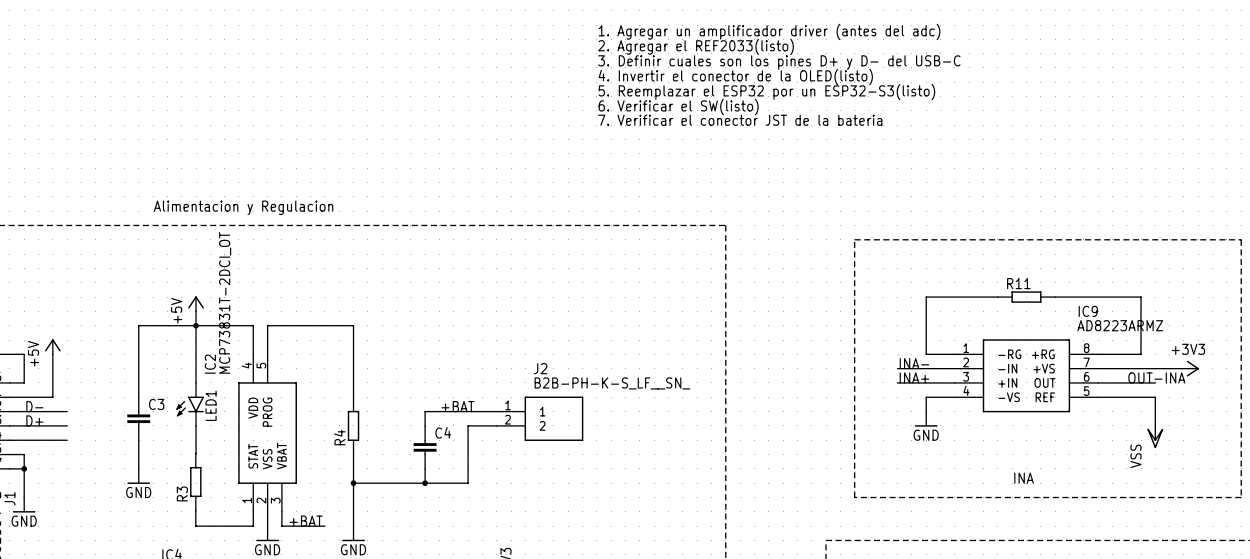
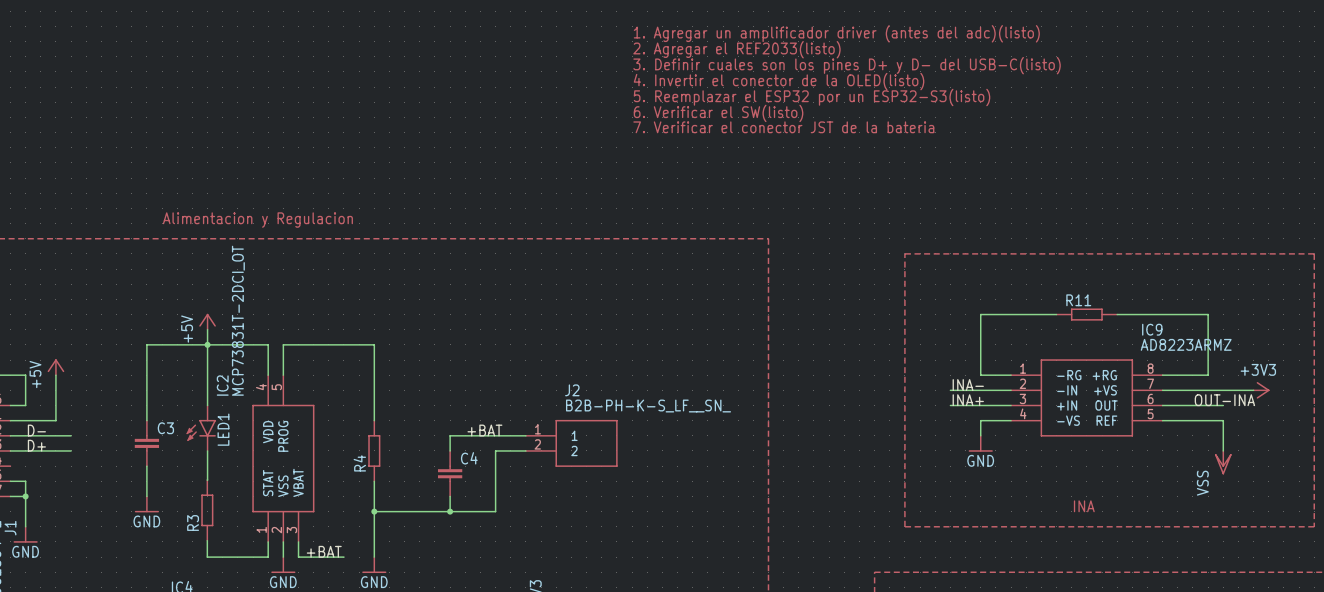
text: 1. Agregar un amplificador driver (antes del adc) (769, 31) -> 1. Agregar un amplificador driver (antes del adc)(listo) (836, 33)
text: 3. Definir cuales son los pines D+ y D- del USB-C (779, 62) -> 3. Definir cuales son los pines D+ y D- del USB-C(listo) (847, 65)
wire: (9, 440) (67, 440) -> none

